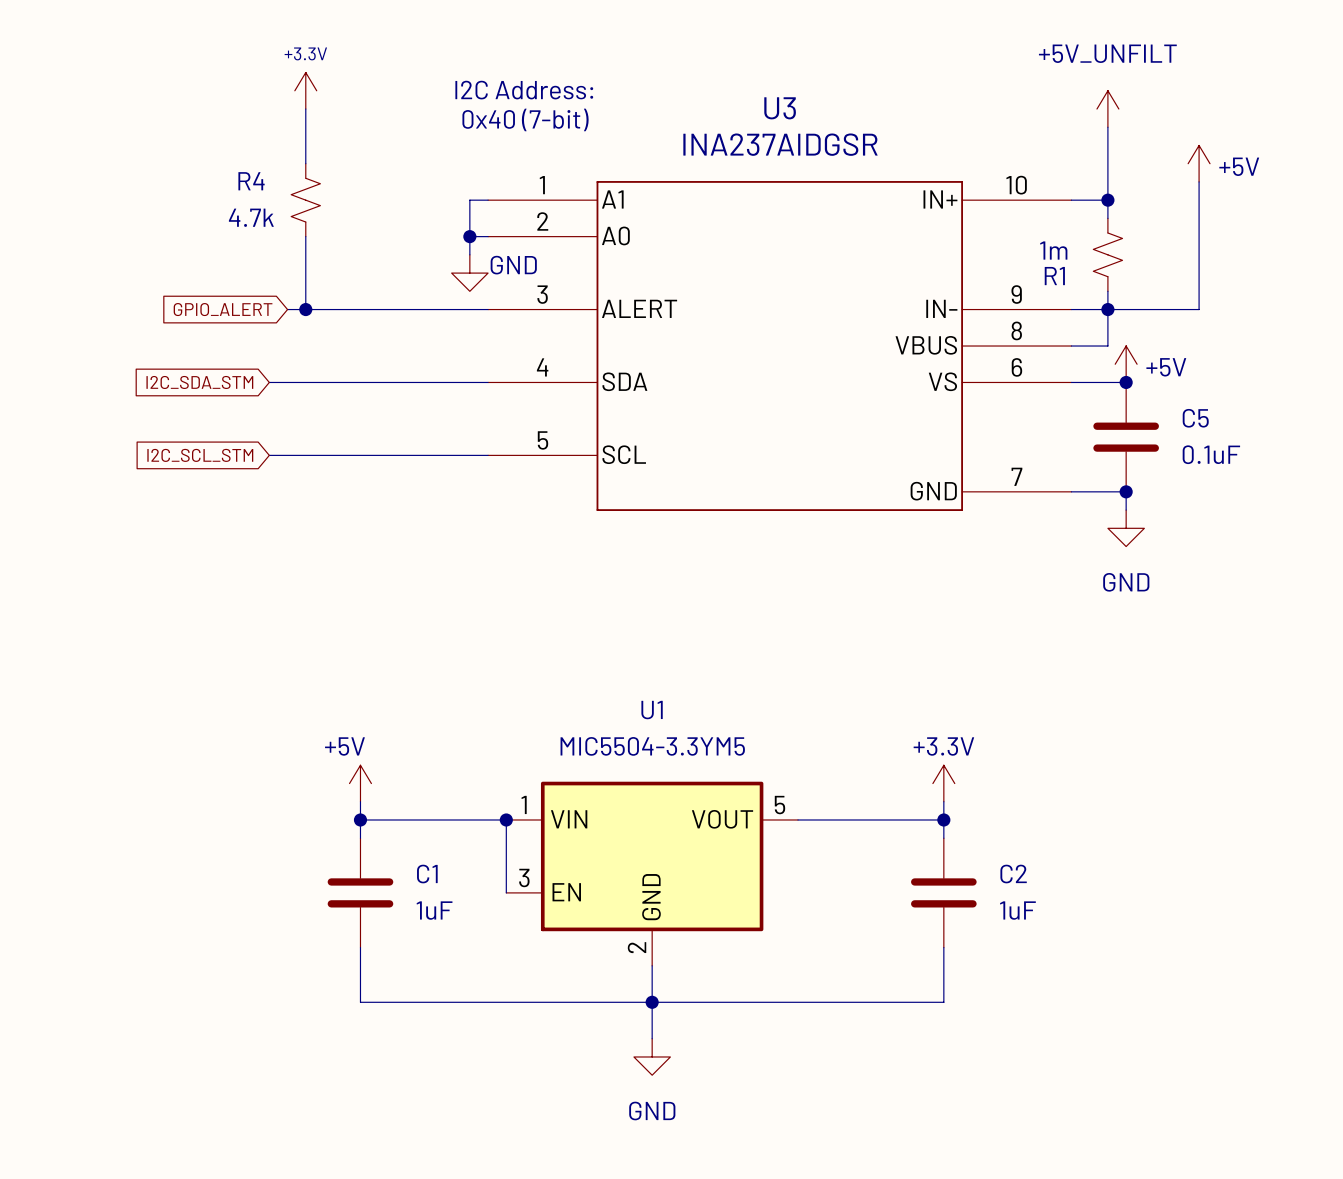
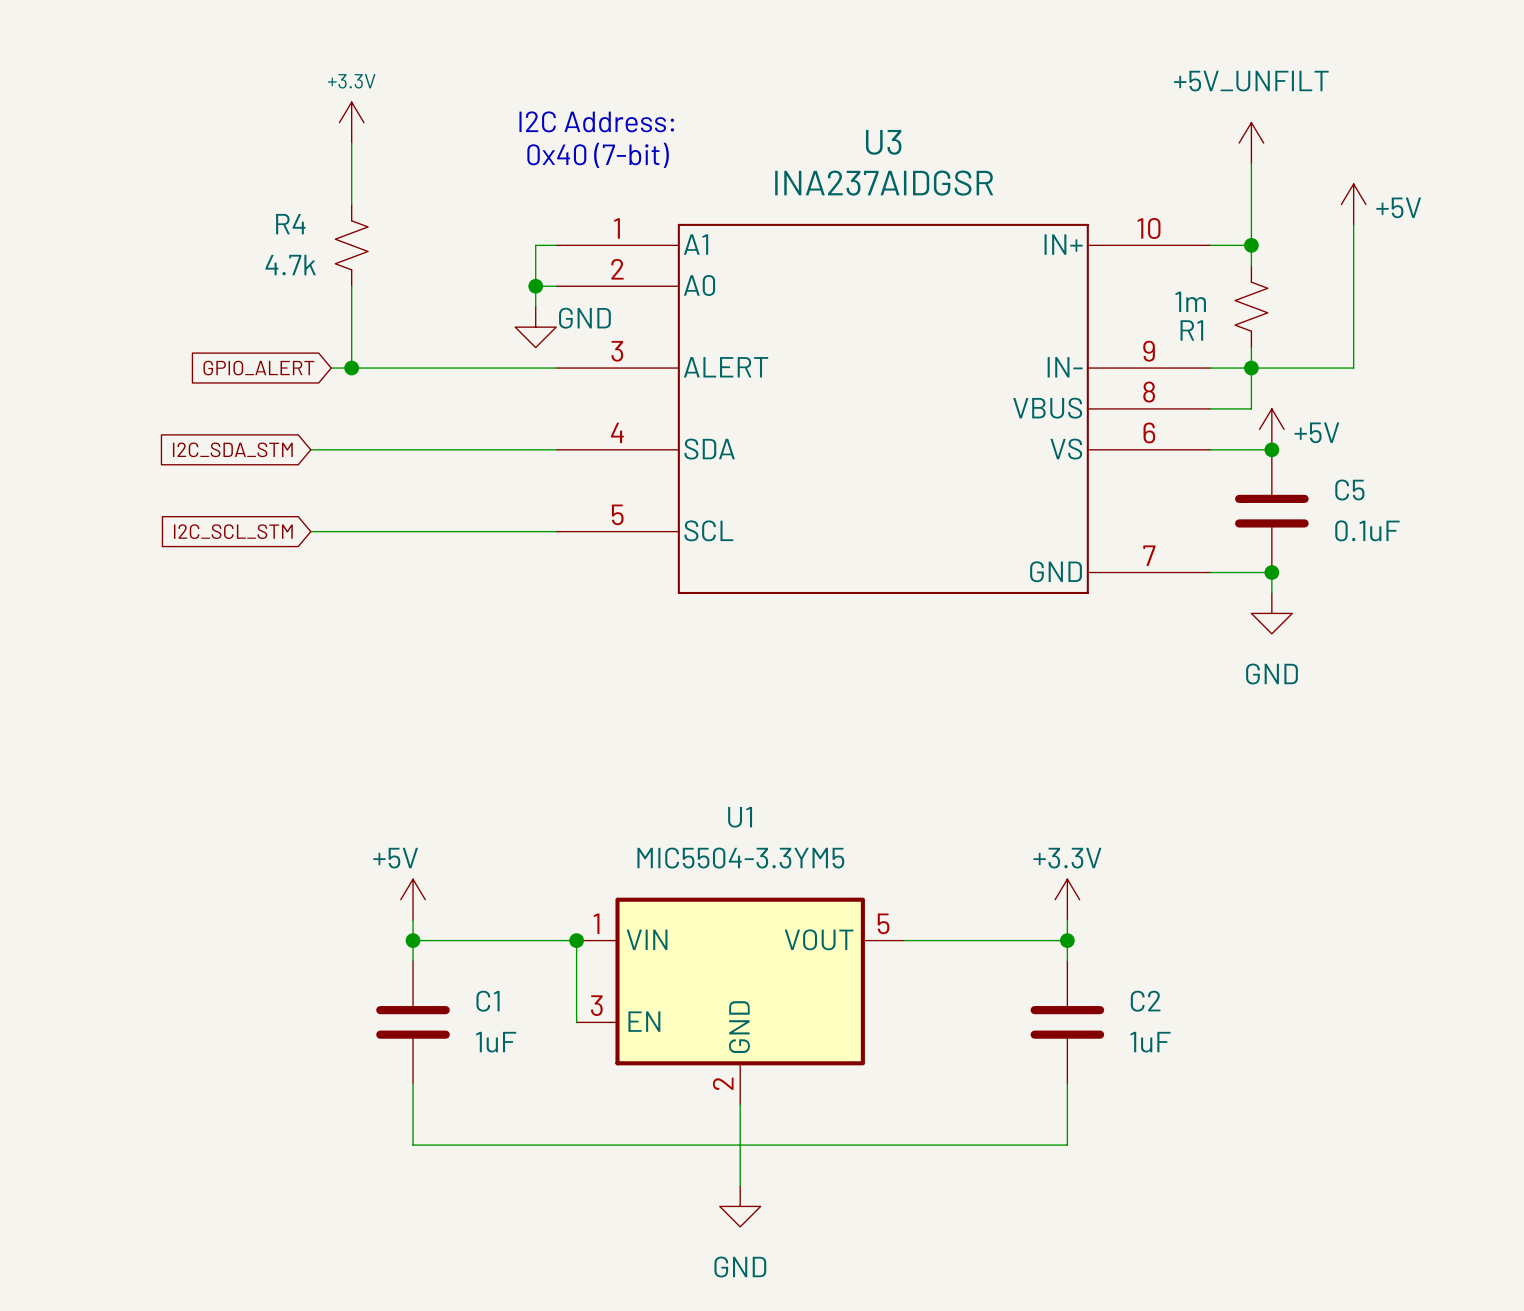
junction: (652, 1002) -> none

